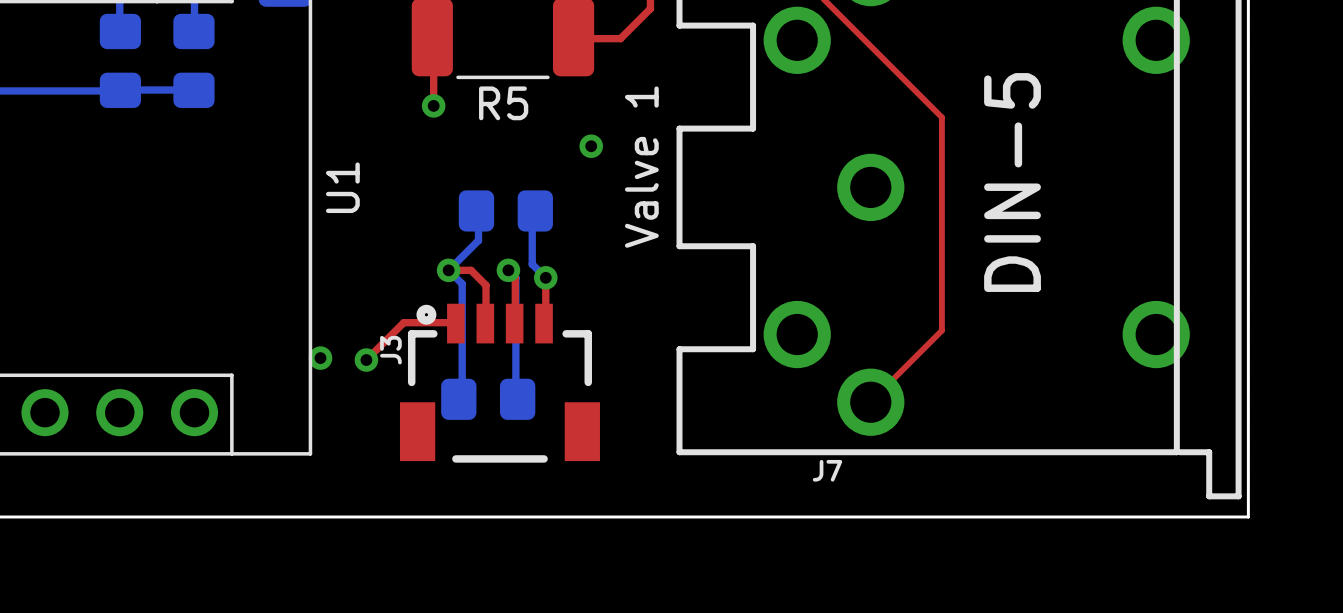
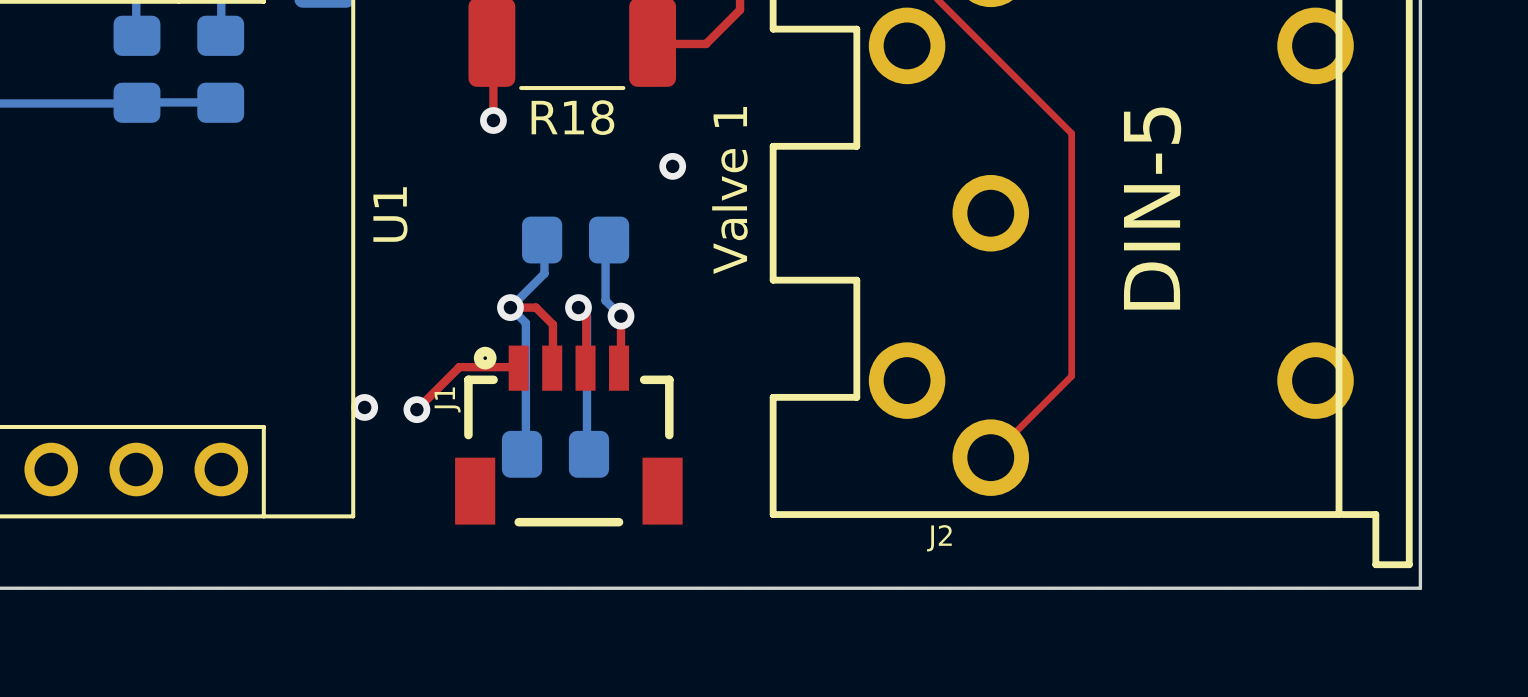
R5 name: R5 (503, 103) -> R18 (572, 117)
J3 name: J3 (390, 350) -> J1 (447, 399)
J7 name: J7 (827, 470) -> J2 (939, 538)

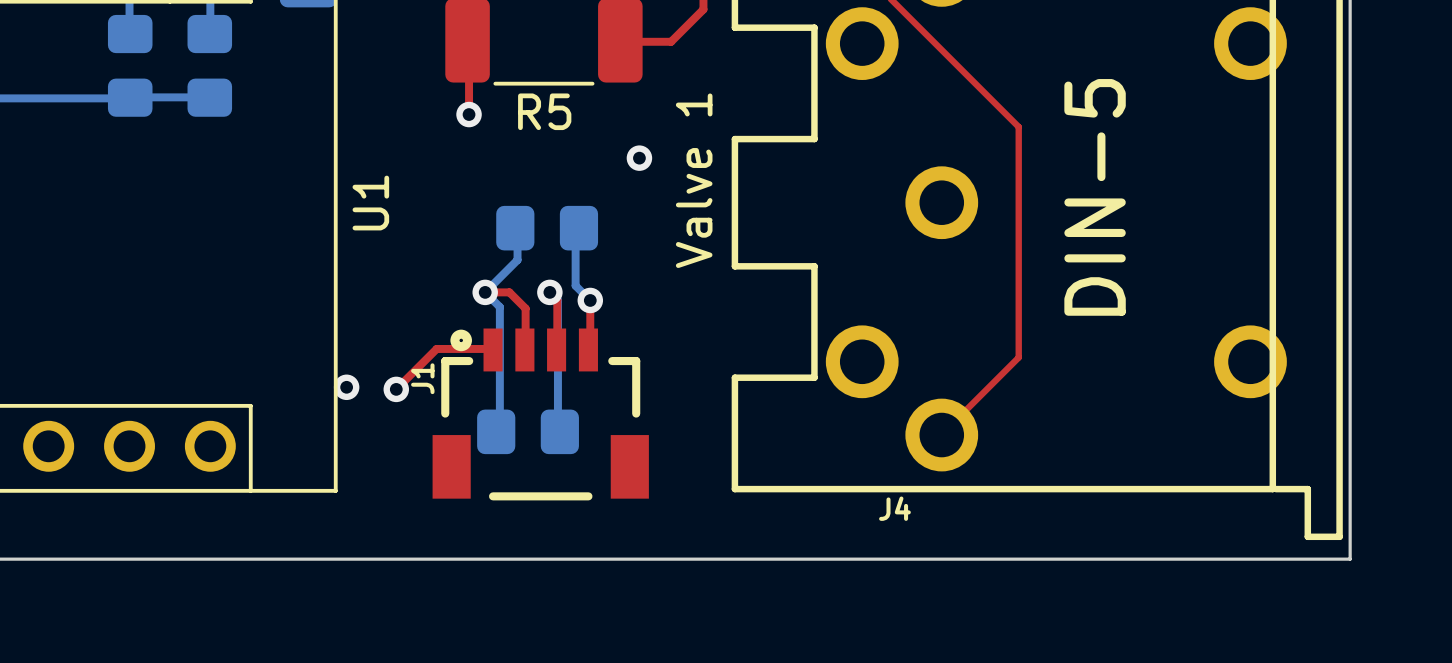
R18 name: R18 (572, 117) -> R5 (544, 111)
J2 name: J2 (939, 538) -> J4 (894, 508)

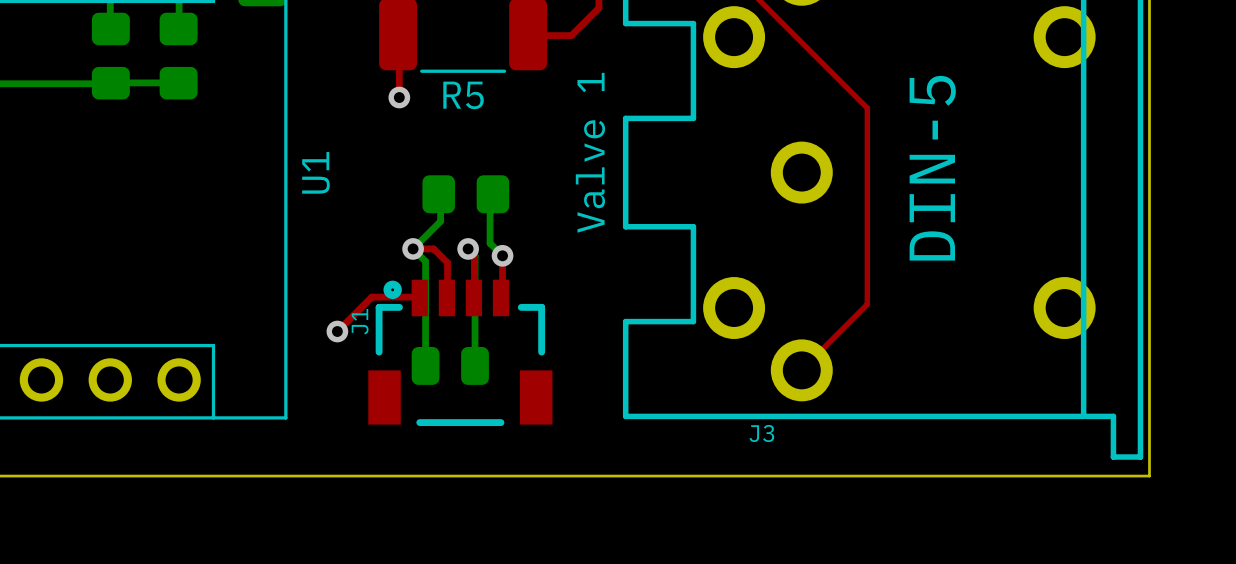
via: (639, 158) -> none
via: (346, 387) -> none
part footprint: [477, 409, 579, 455] -> [411, 346, 489, 385]
J4 name: J4 (894, 508) -> J3 (761, 433)

